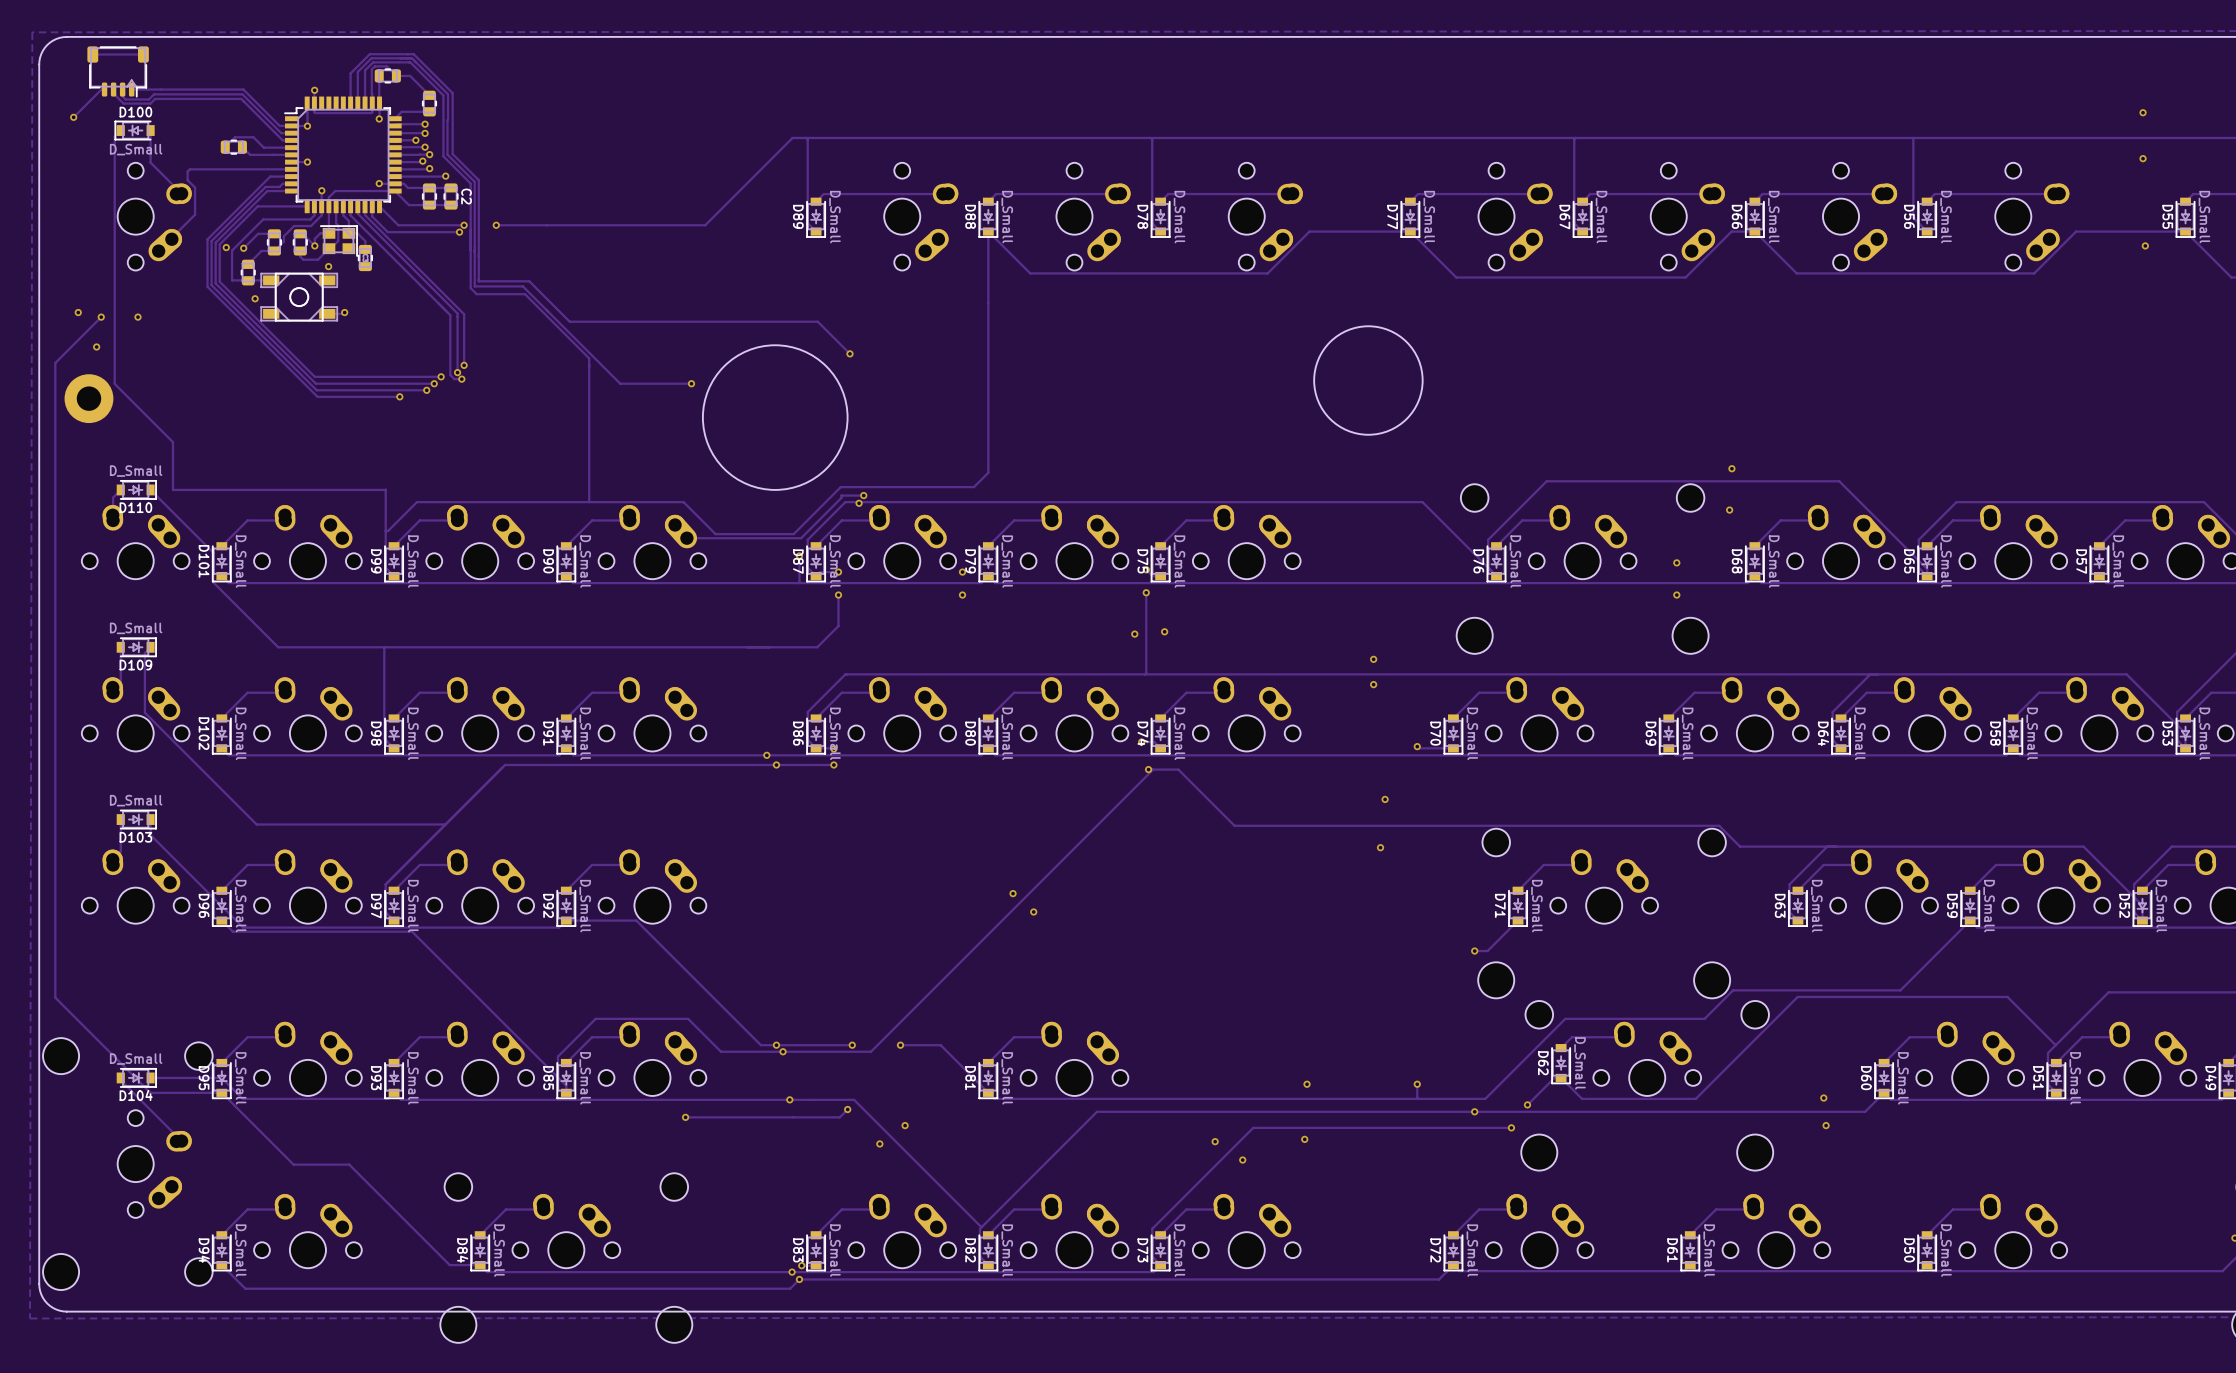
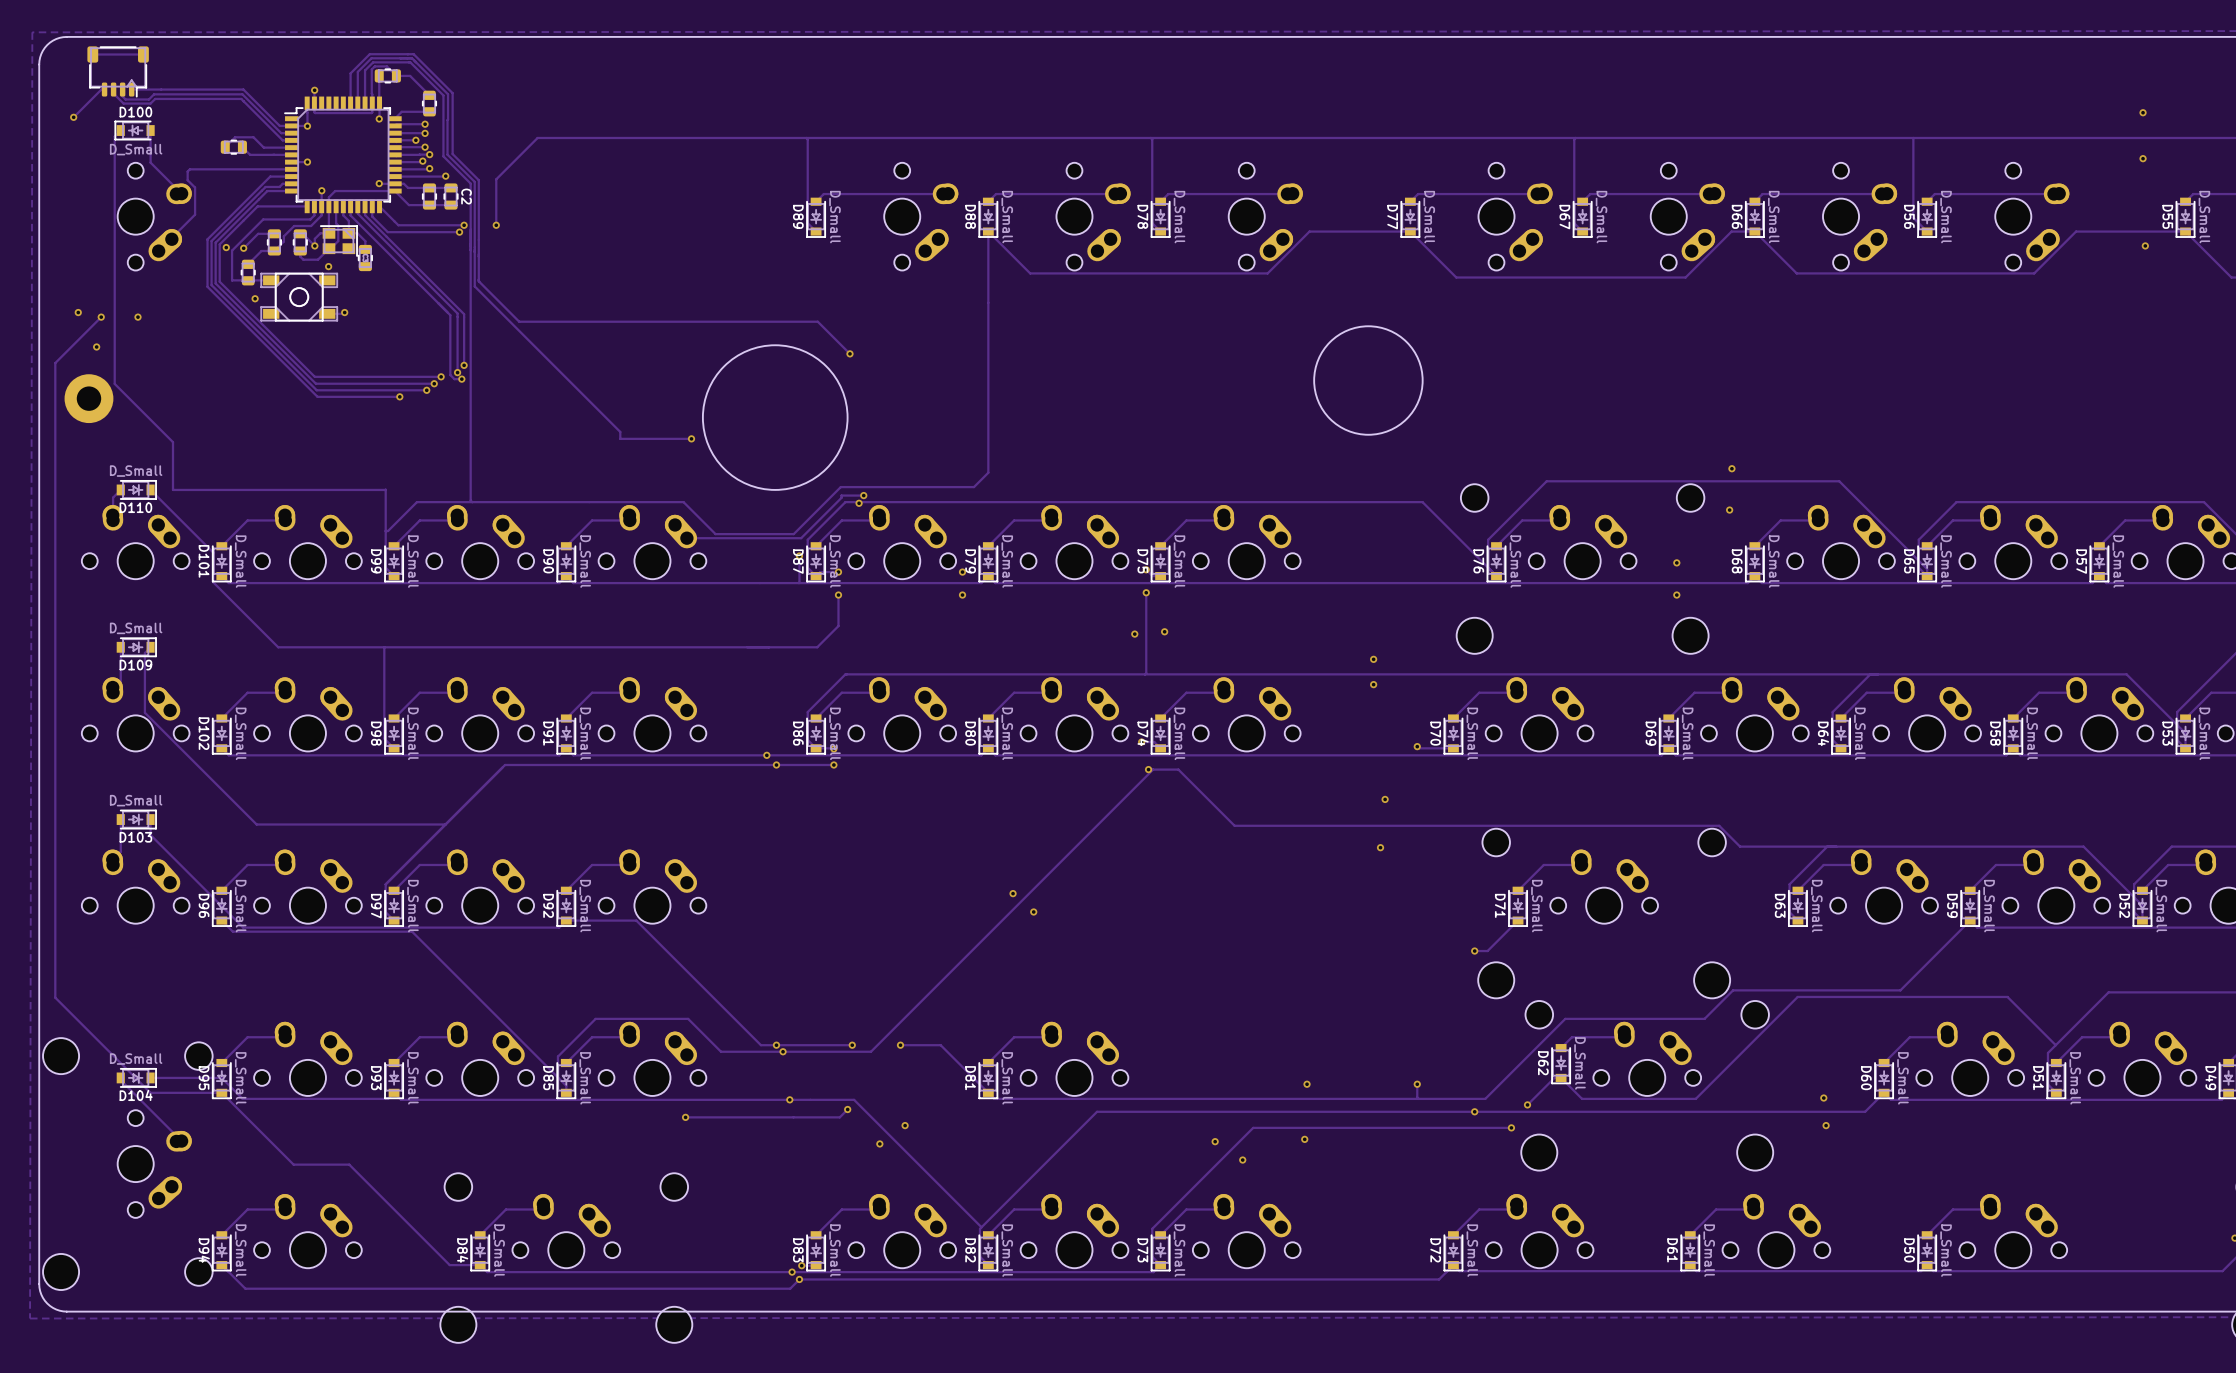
track: (792, 137) (705, 225) (496, 225) -> (792, 137) (537, 137) (496, 179) (496, 225)
track: (479, 281) (529, 281) (569, 321) -> (478, 281) (519, 321) (569, 321)
track: (474, 286) (522, 286) (620, 383) (691, 383) -> (474, 286) (620, 431) (620, 438) (691, 438)
track: (470, 288) (476, 294) (524, 294) (589, 358) (589, 502) -> (470, 288) (470, 500) (472, 502)
via: (691, 383) -> none
via: none -> (691, 438)

